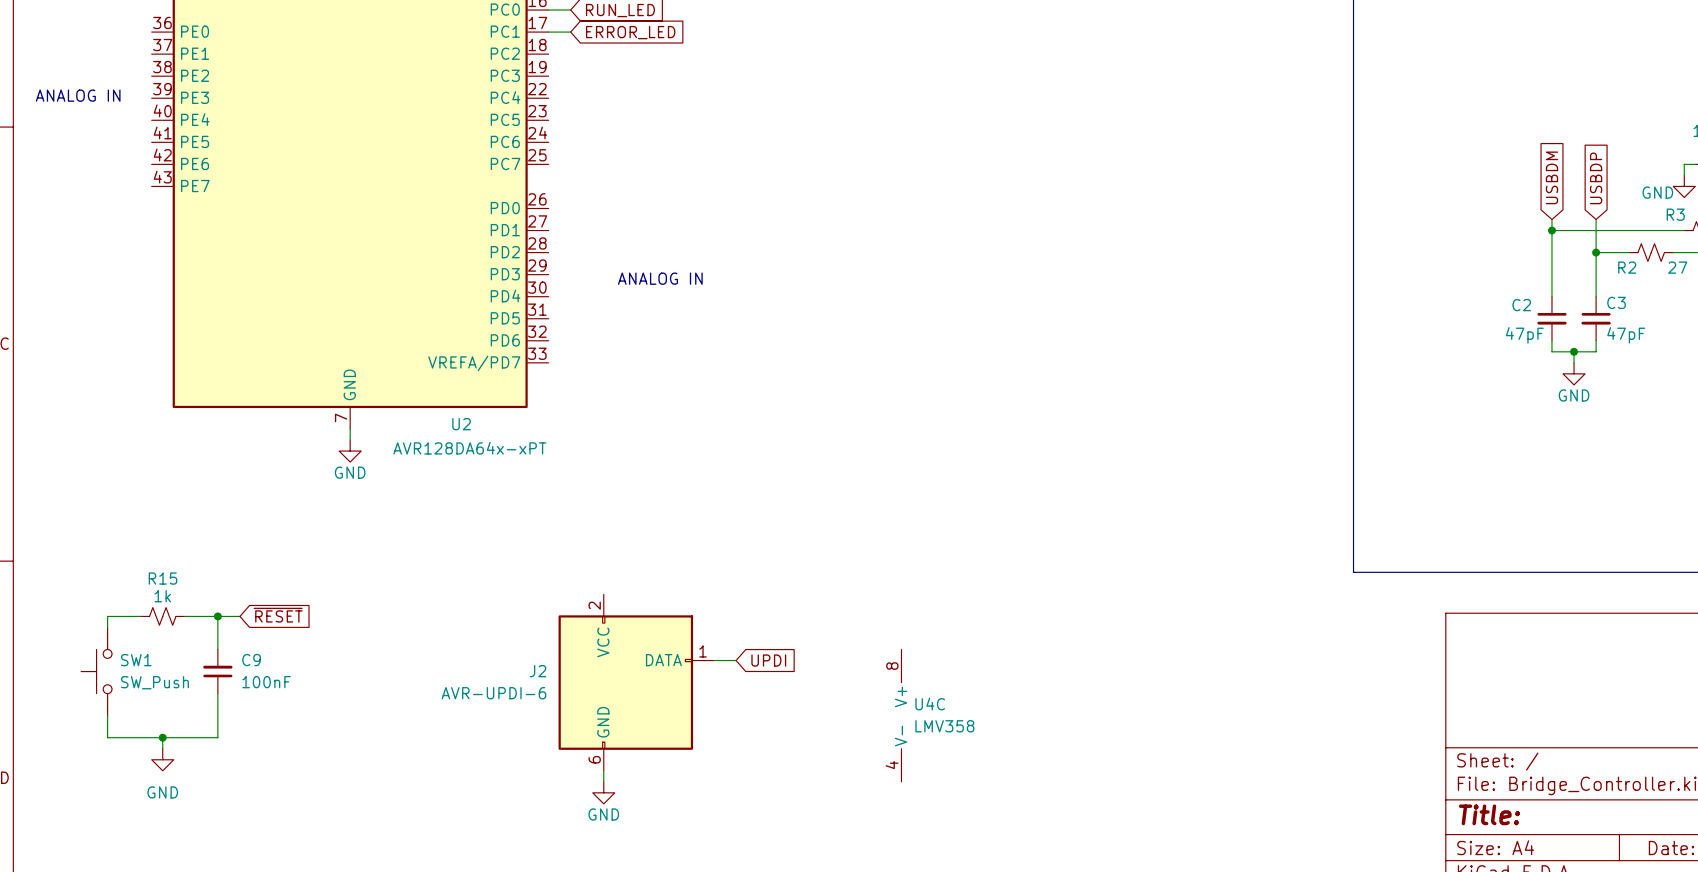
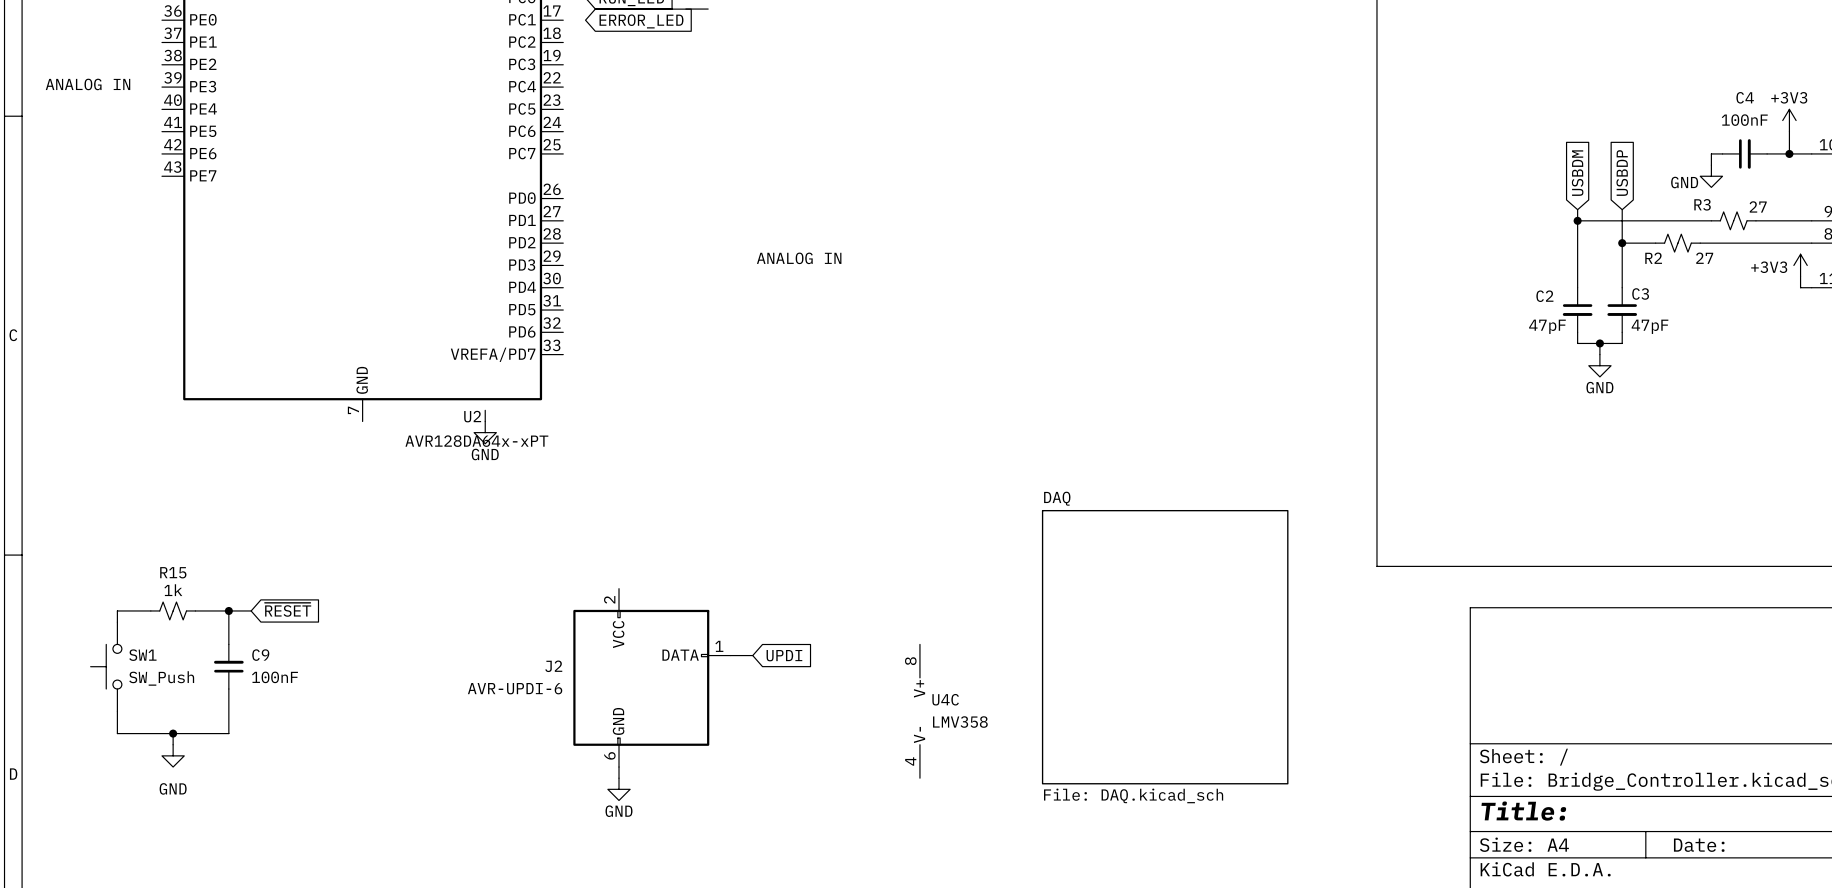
wire: (548, 32) (570, 32) -> (685, 9) (708, 9)
text position: ANALOG IN (660, 278) -> ANALOG IN (799, 258)
wire: (350, 429) (350, 440) -> (485, 410) (485, 421)
power symbol position: GND (350, 451) -> GND (485, 432)
sheet DAQ: none -> File: DAQ.kicad_sch (1165, 647)

